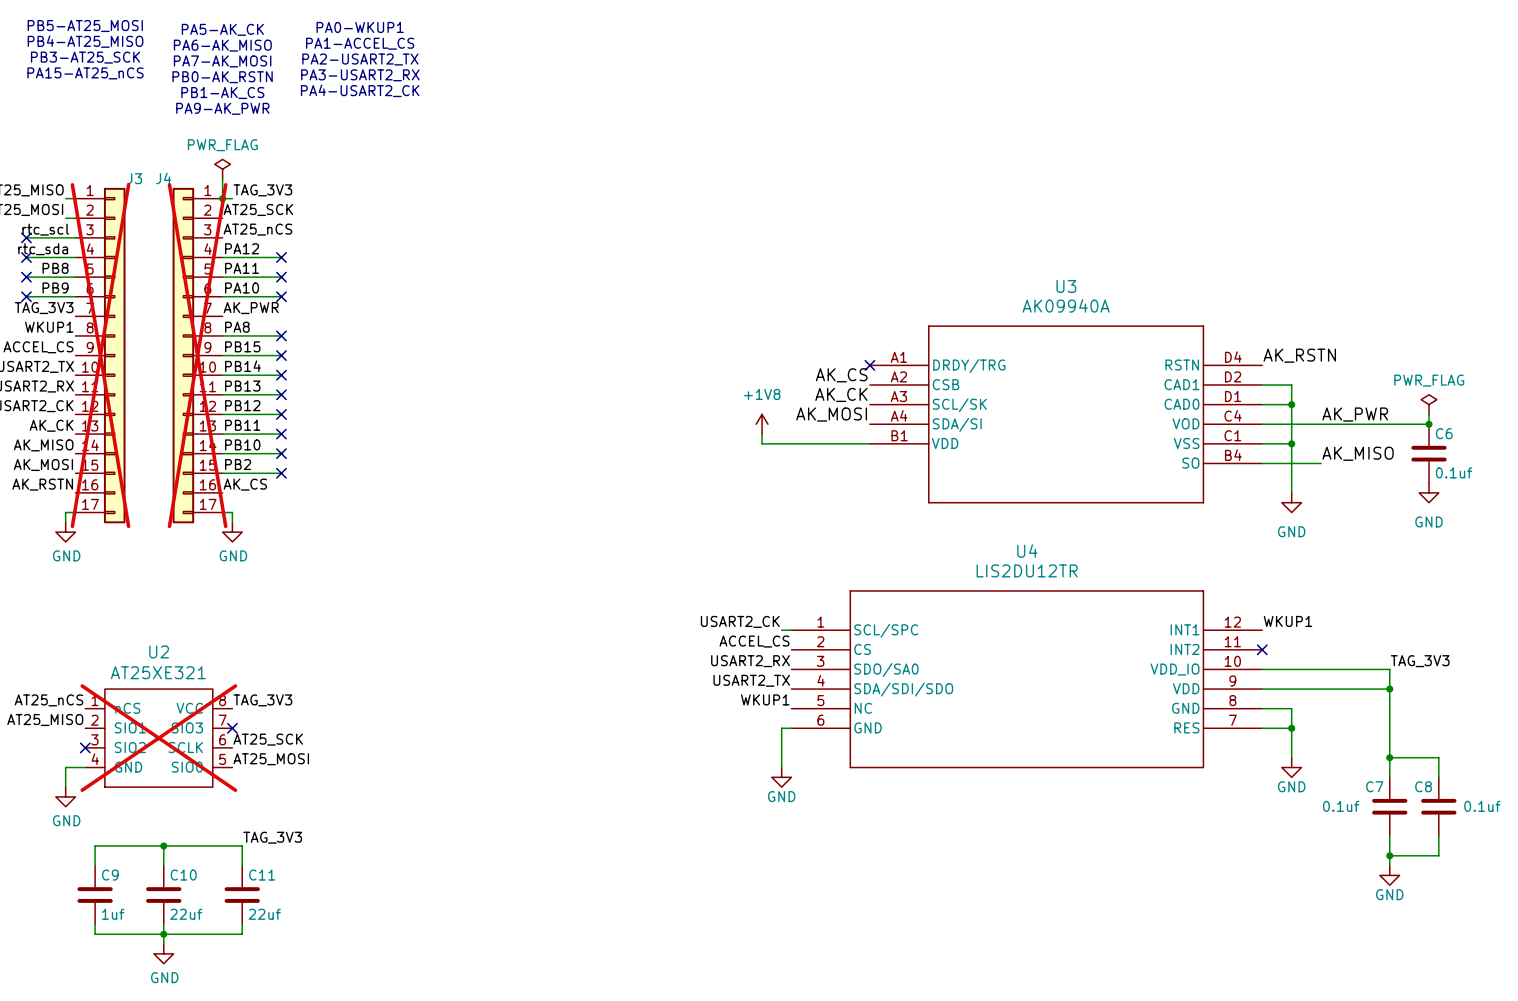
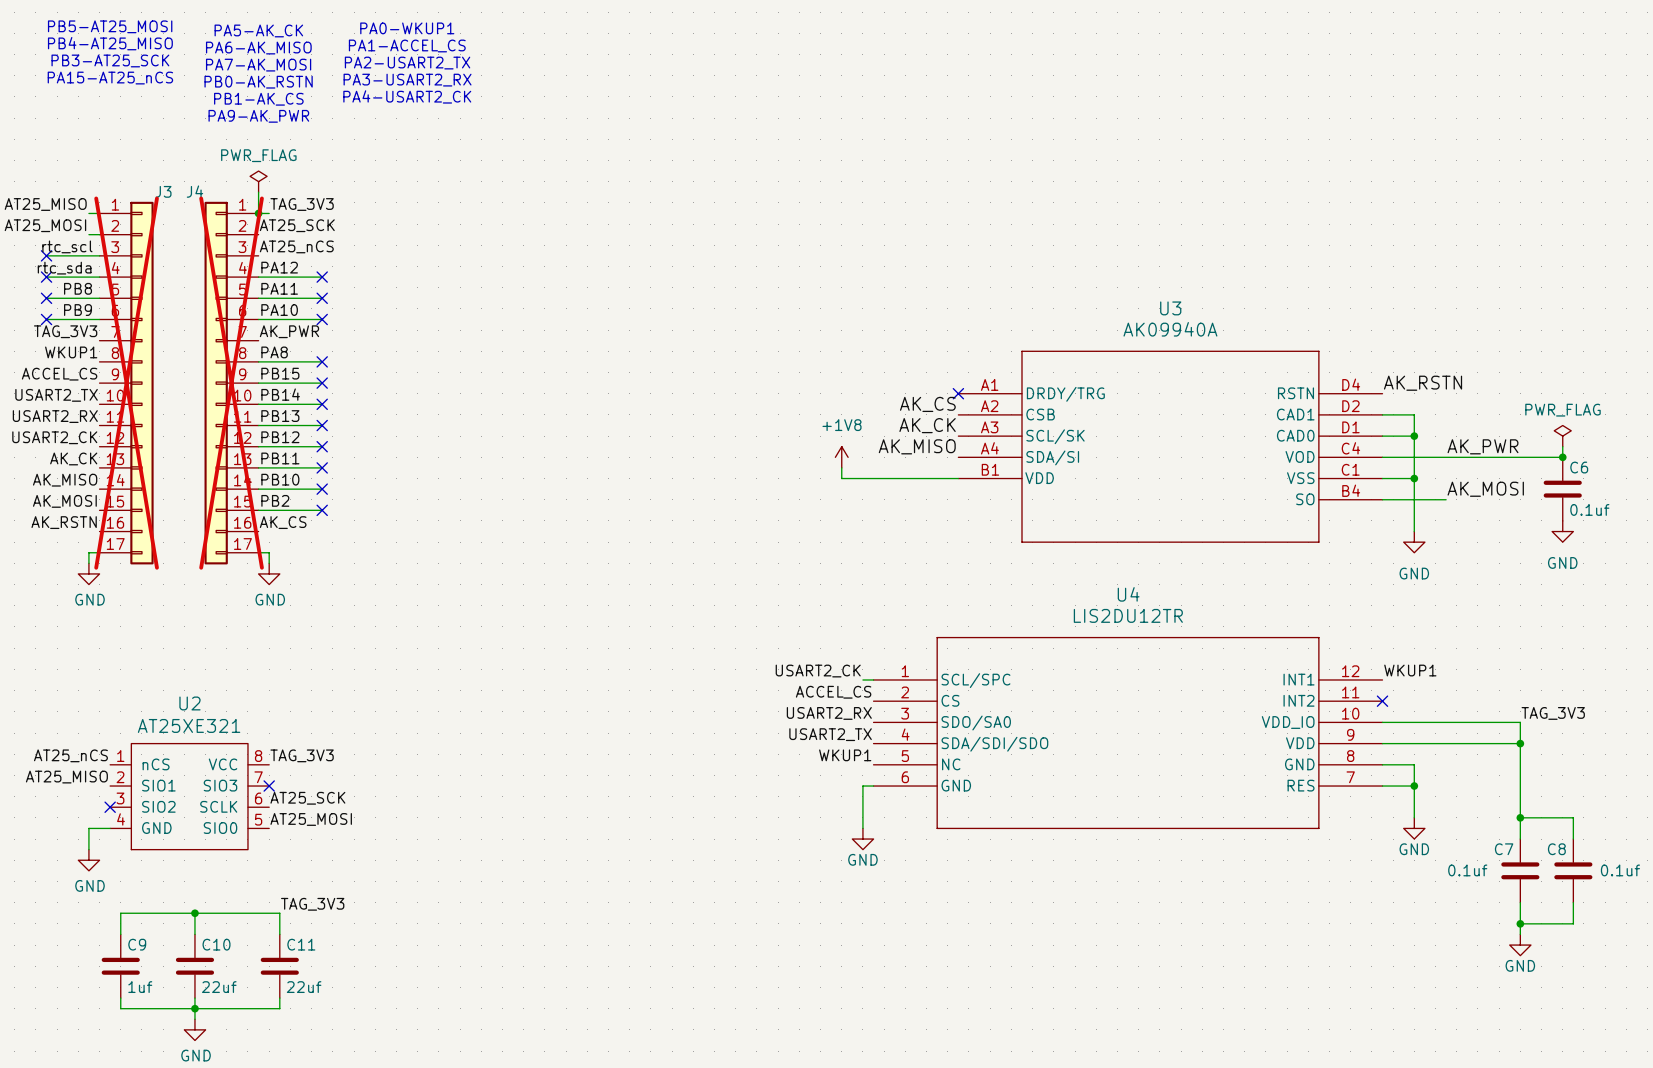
label: AK_MOSI (831, 414) -> AK_MISO (917, 446)
label: AK_MISO (1358, 453) -> AK_MOSI (1485, 489)
U2 do-not-place cross: (158, 738) -> none

